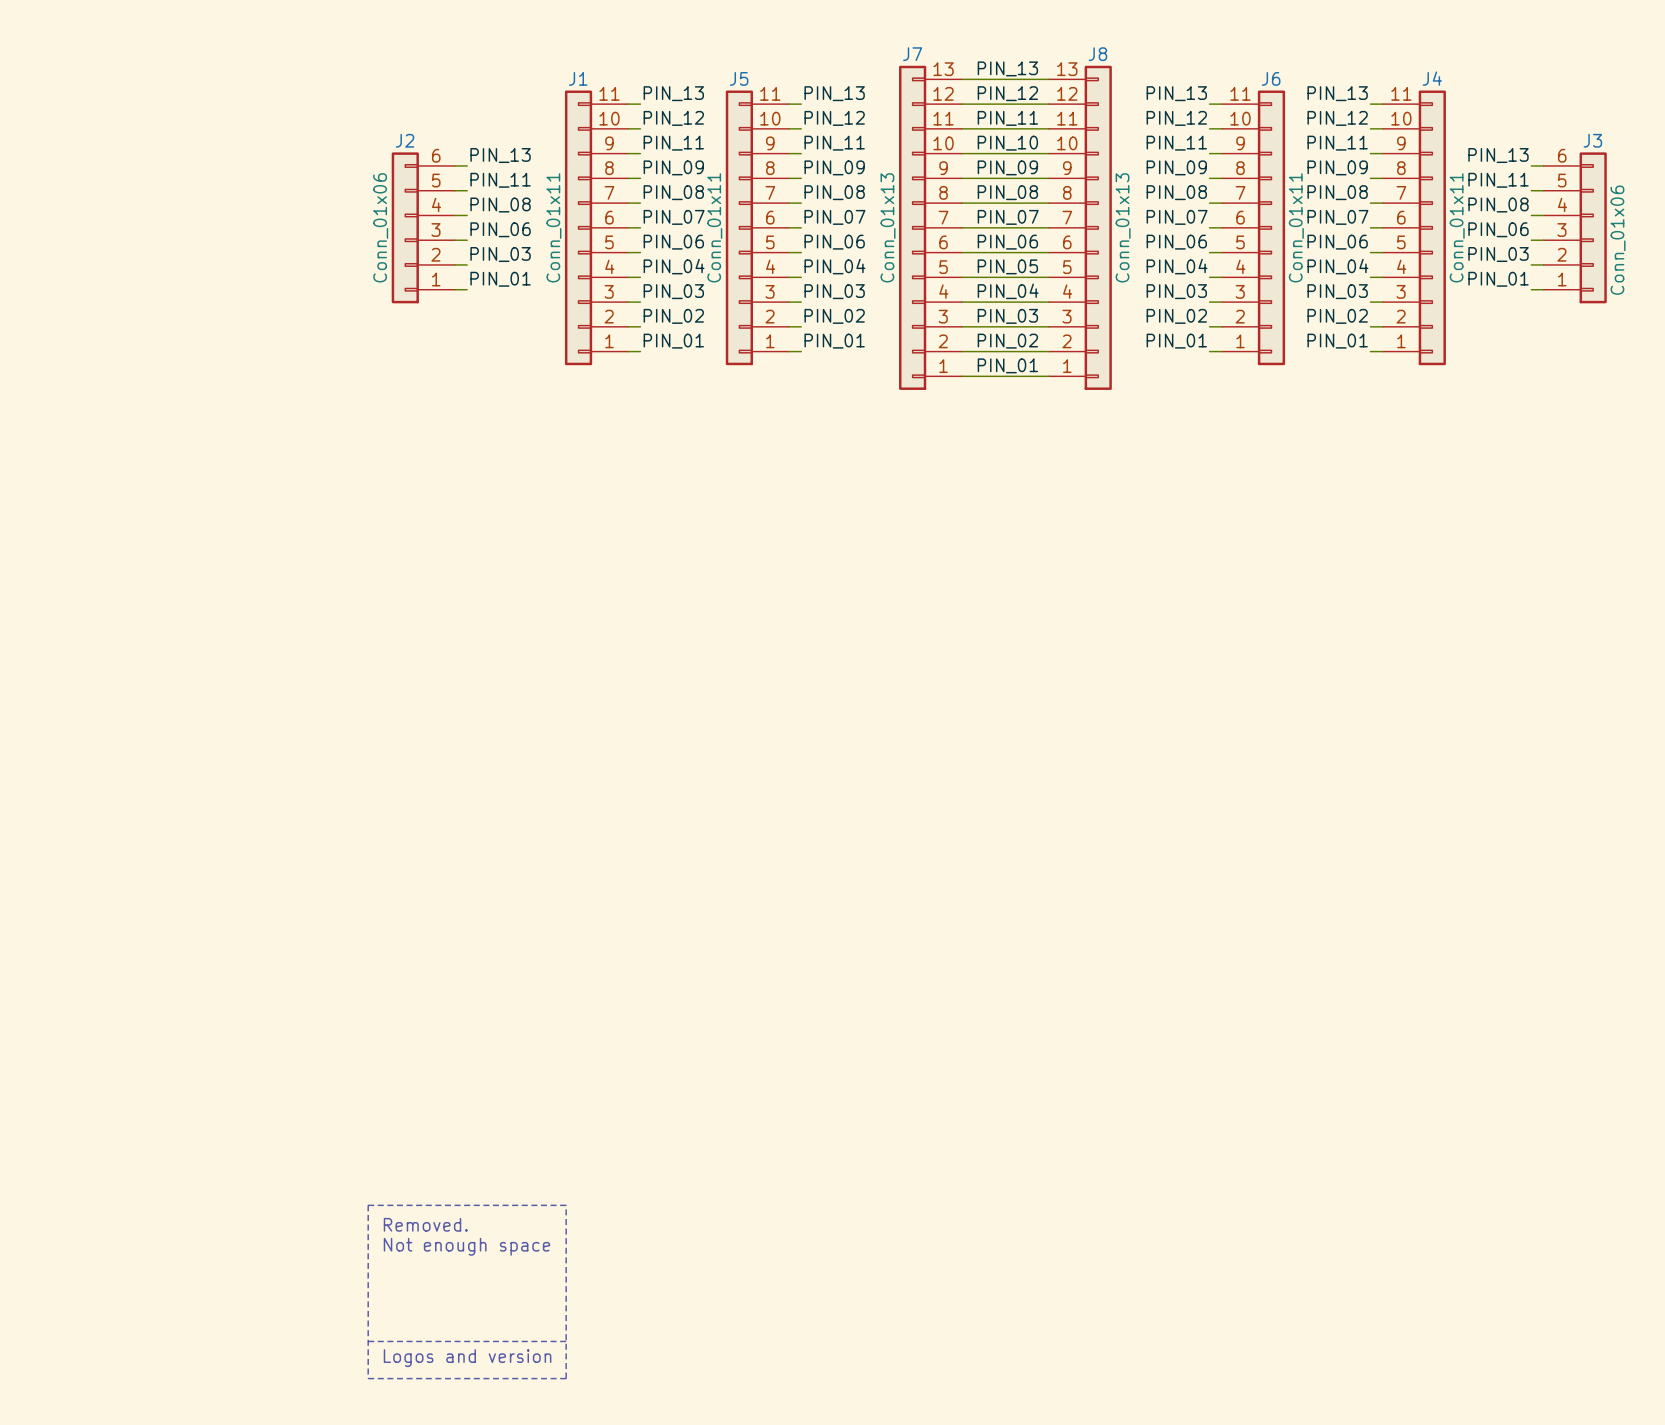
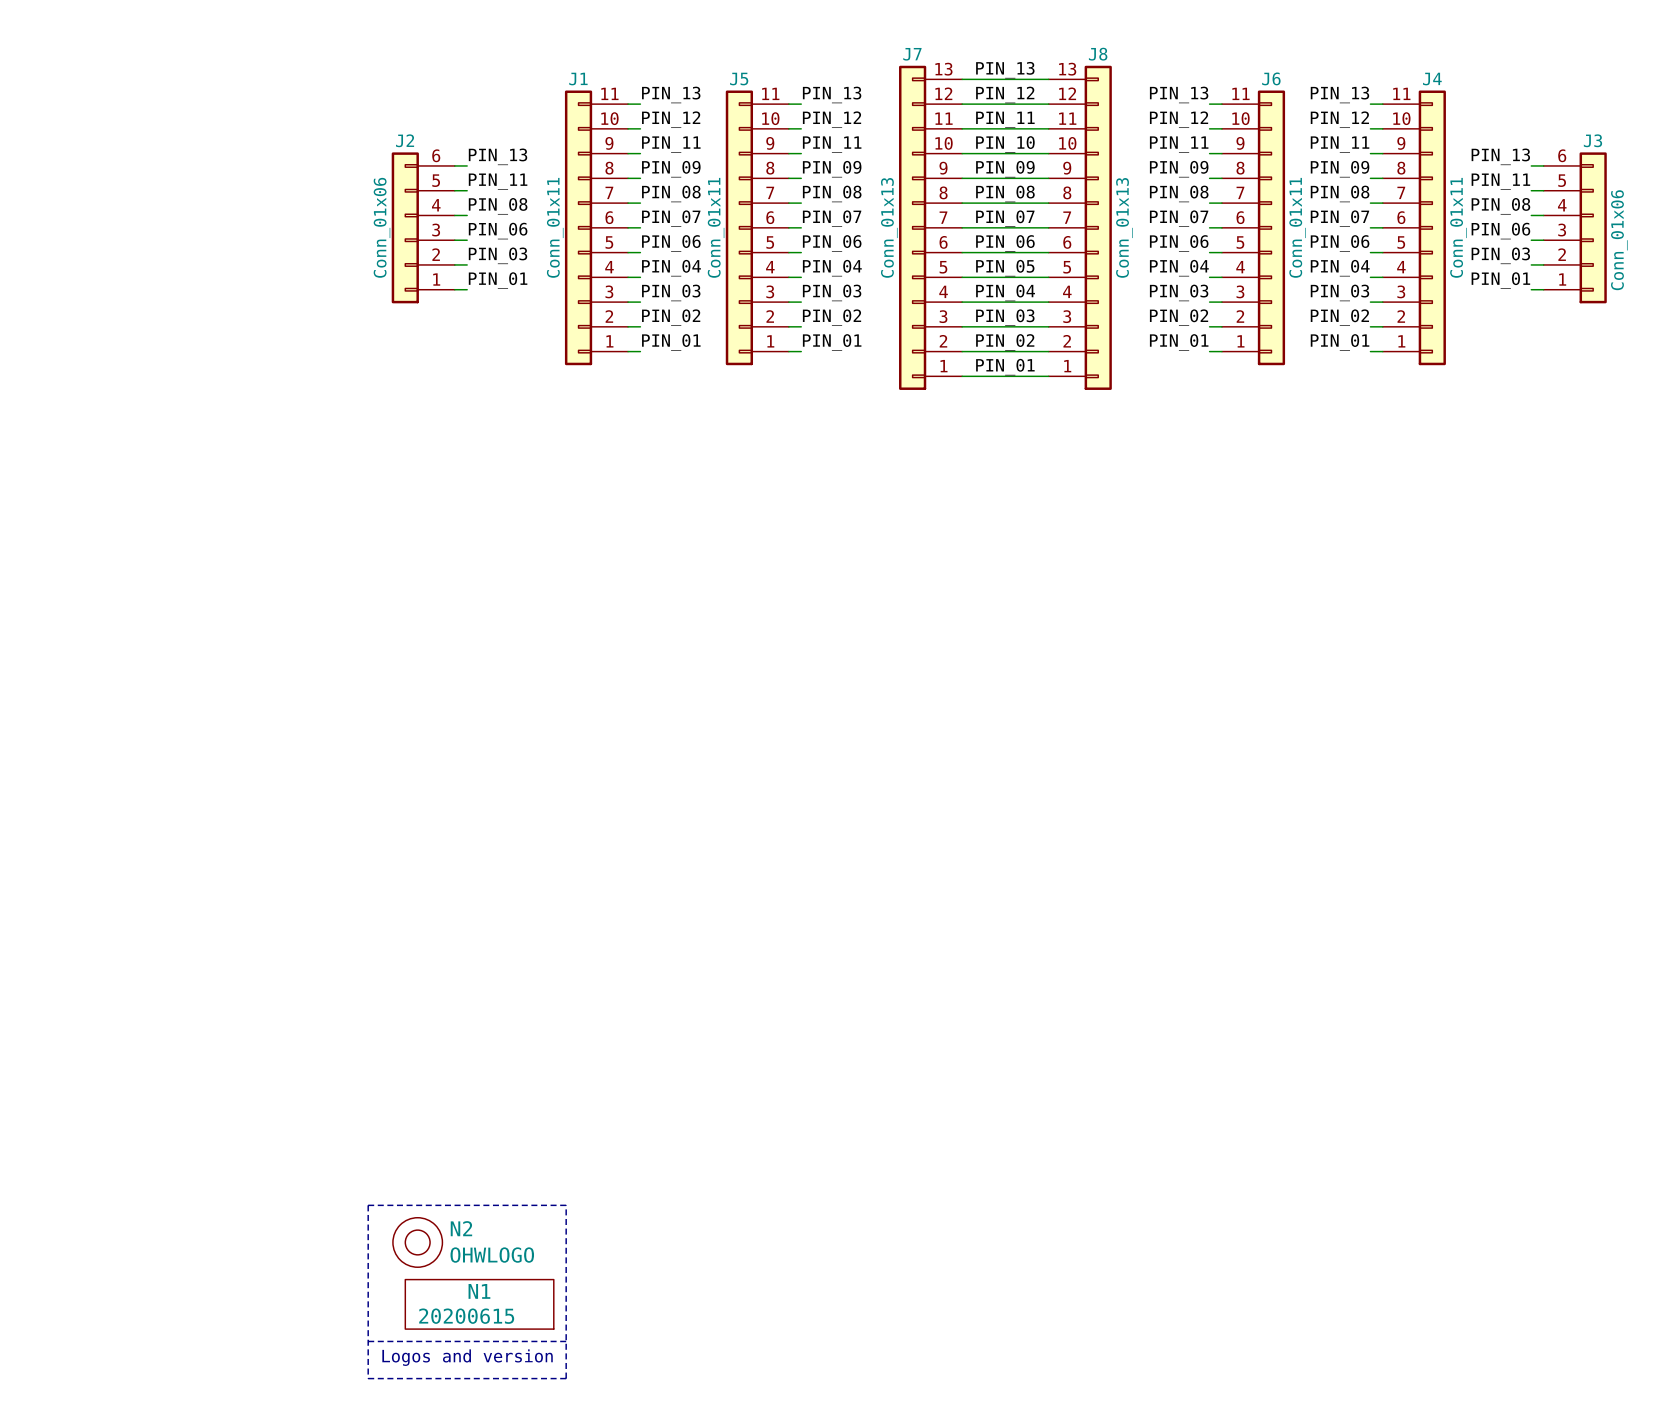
text: Removed. (425, 1224) -> none
N2: none -> OHWLOGO (417, 1242)
text: Not enough space (466, 1246) -> none
N1: none -> 20200615 (479, 1304)

